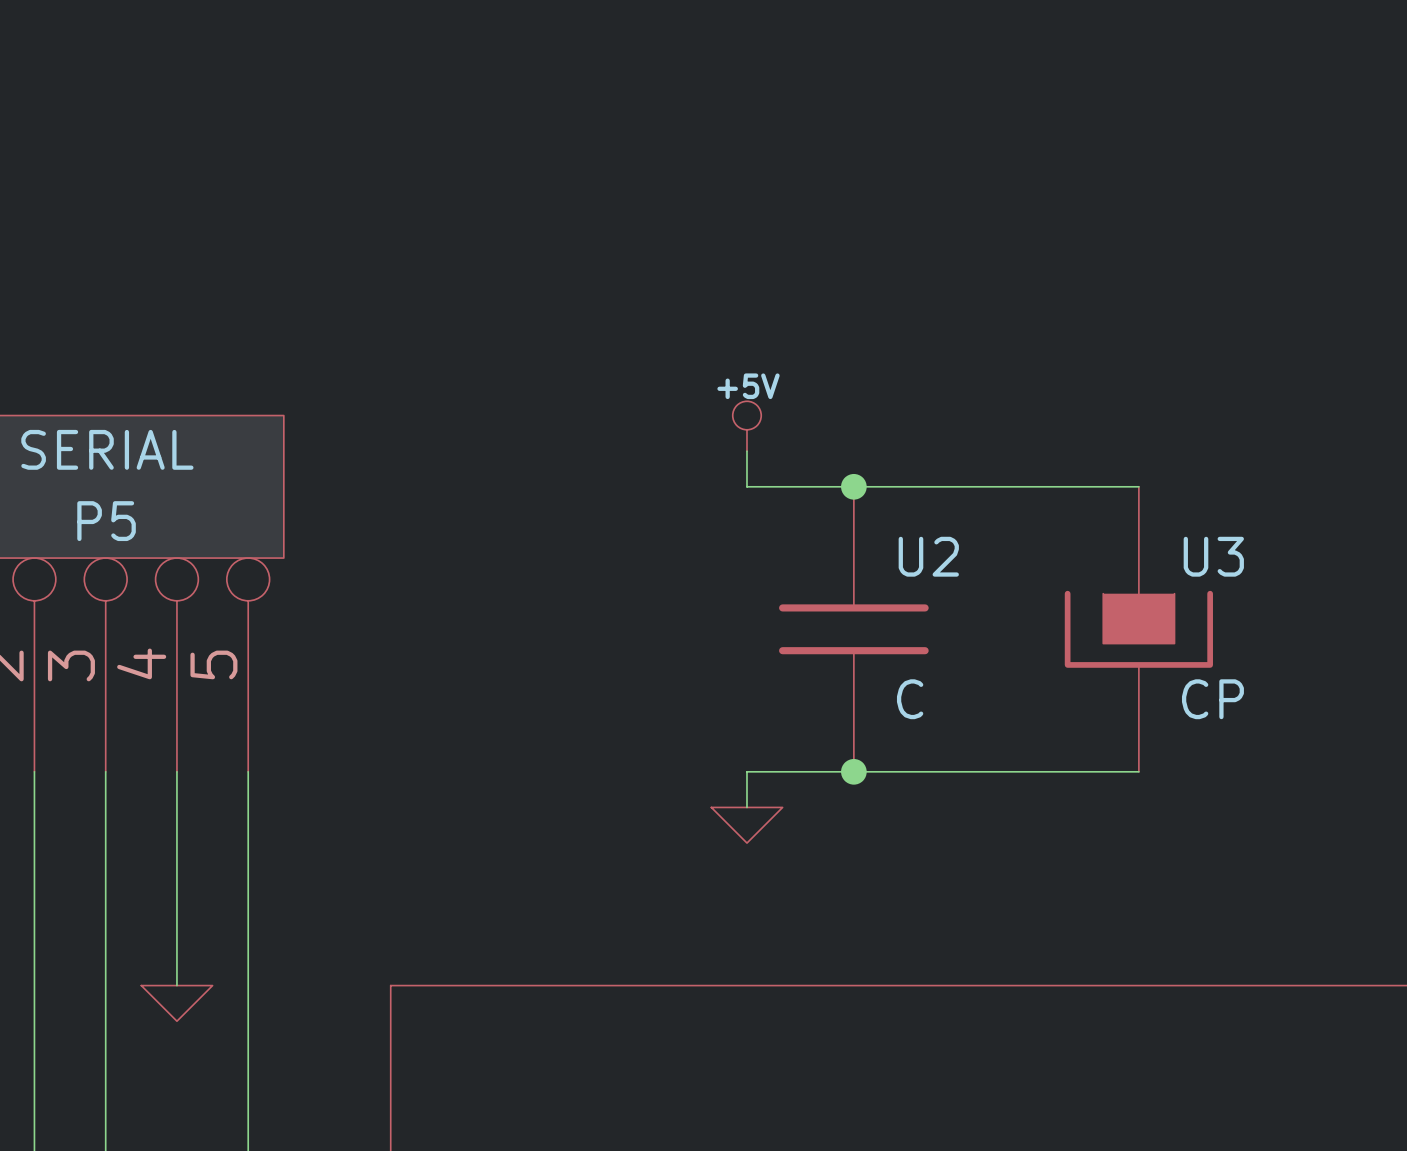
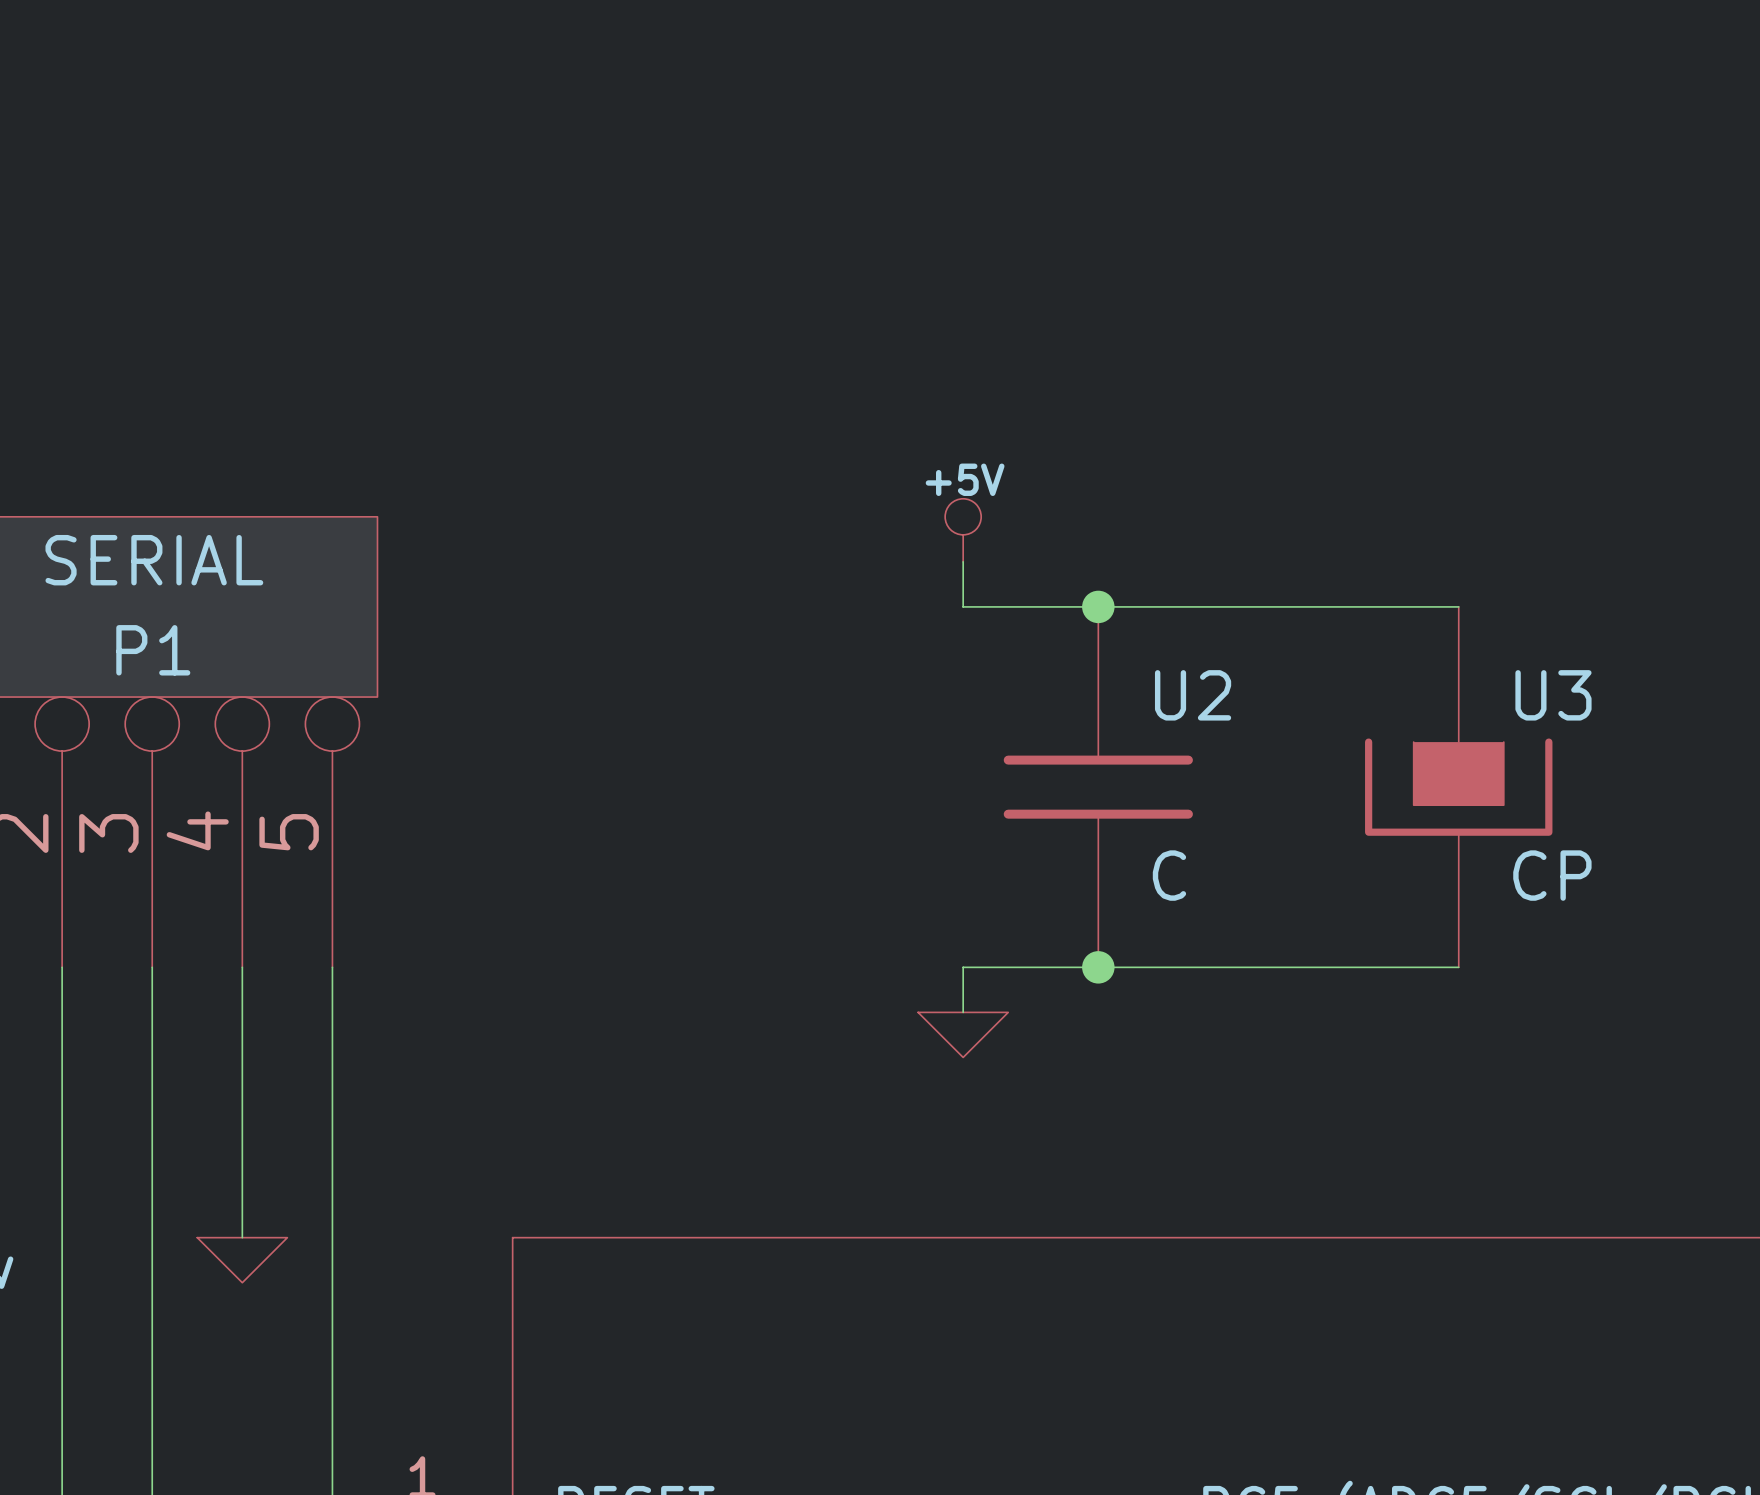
P5 name: P5 (106, 521) -> P1 (153, 650)

